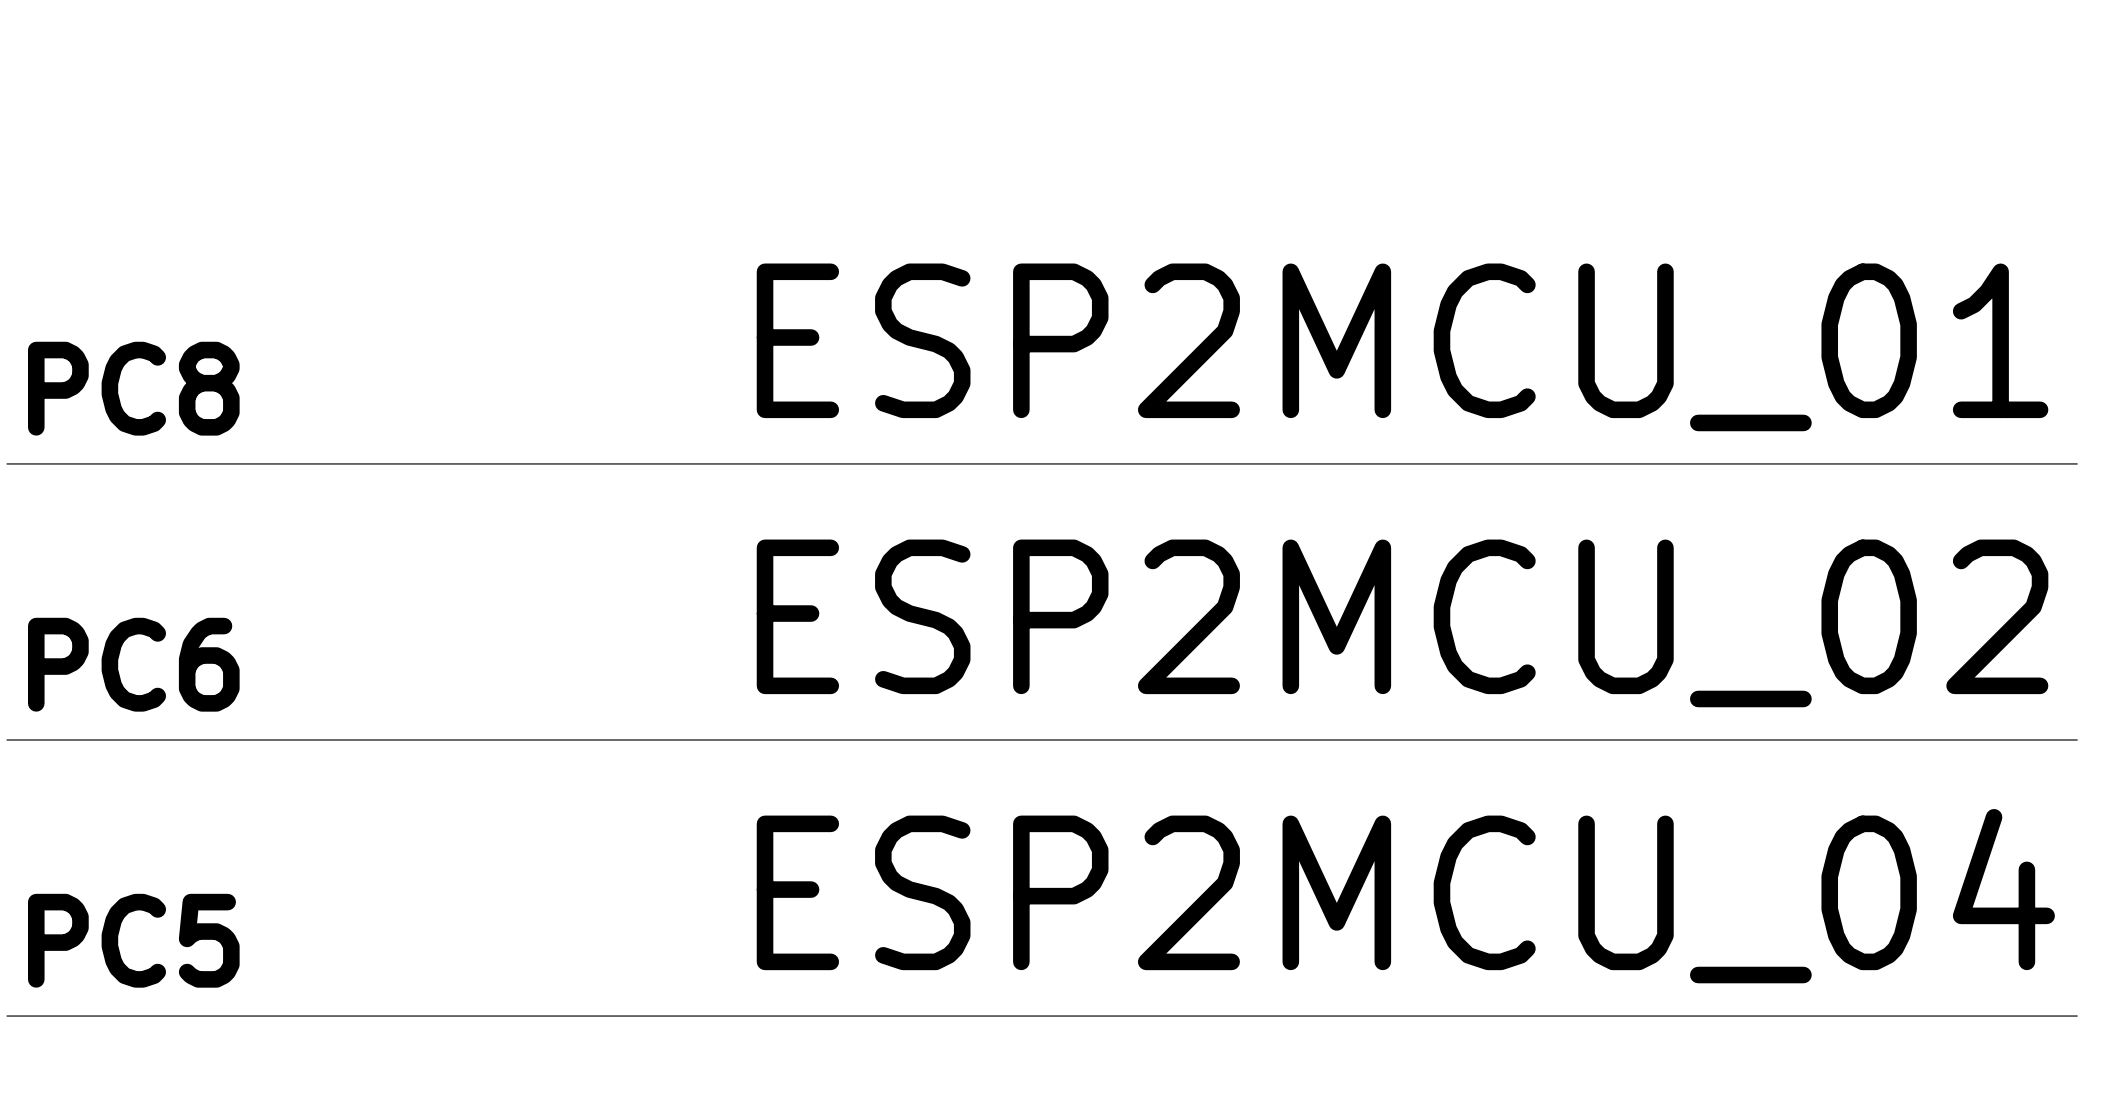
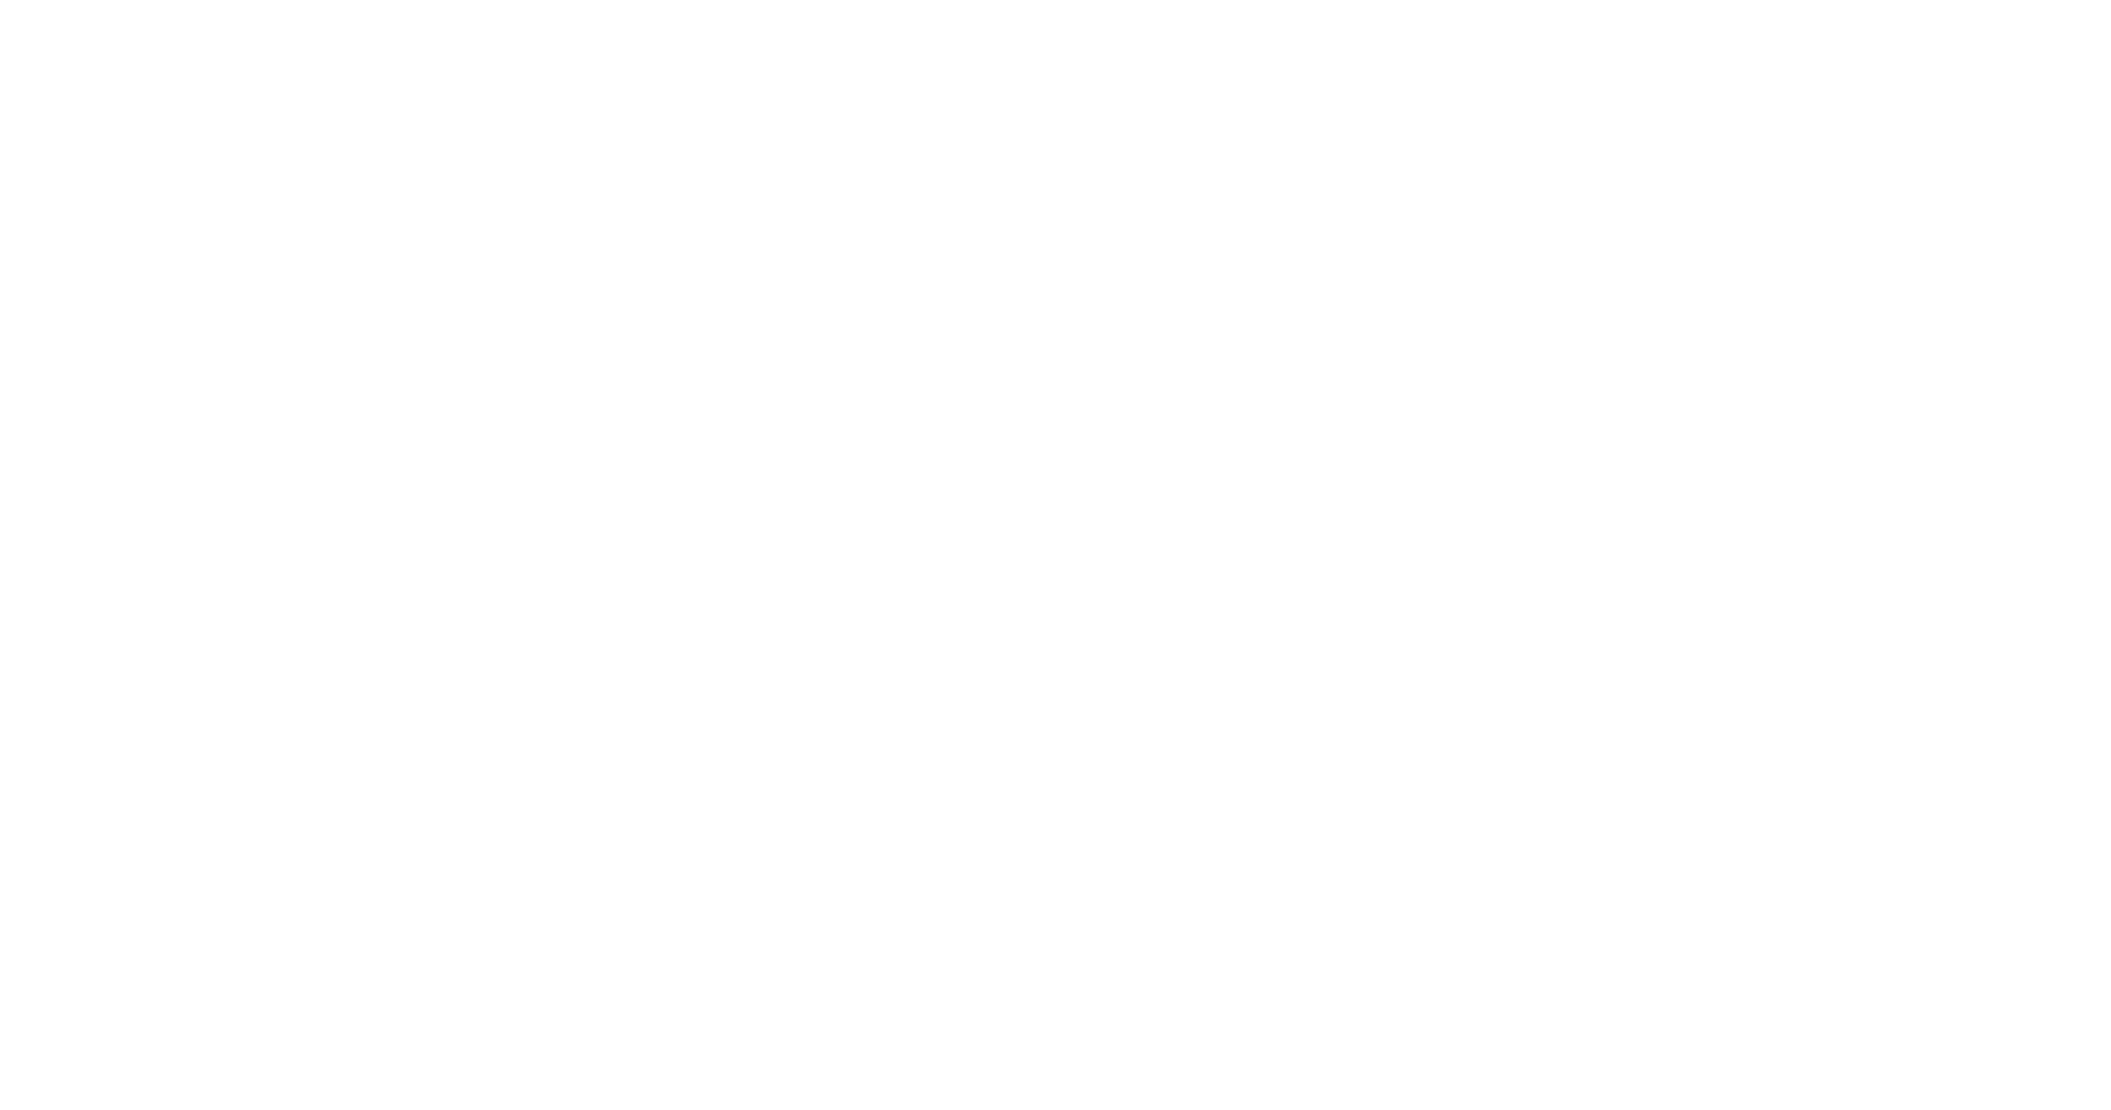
label: ESP2MCU_01 (1402, 347) -> none
text: PC8 (133, 388) -> none
wire: (6, 463) (2077, 463) -> none
label: ESP2MCU_02 (1402, 623) -> none
text: PC6 (133, 664) -> none
wire: (6, 739) (2077, 739) -> none
label: ESP2MCU_04 (1405, 896) -> none
text: PC5 (133, 940) -> none
wire: (6, 1016) (2077, 1016) -> none

